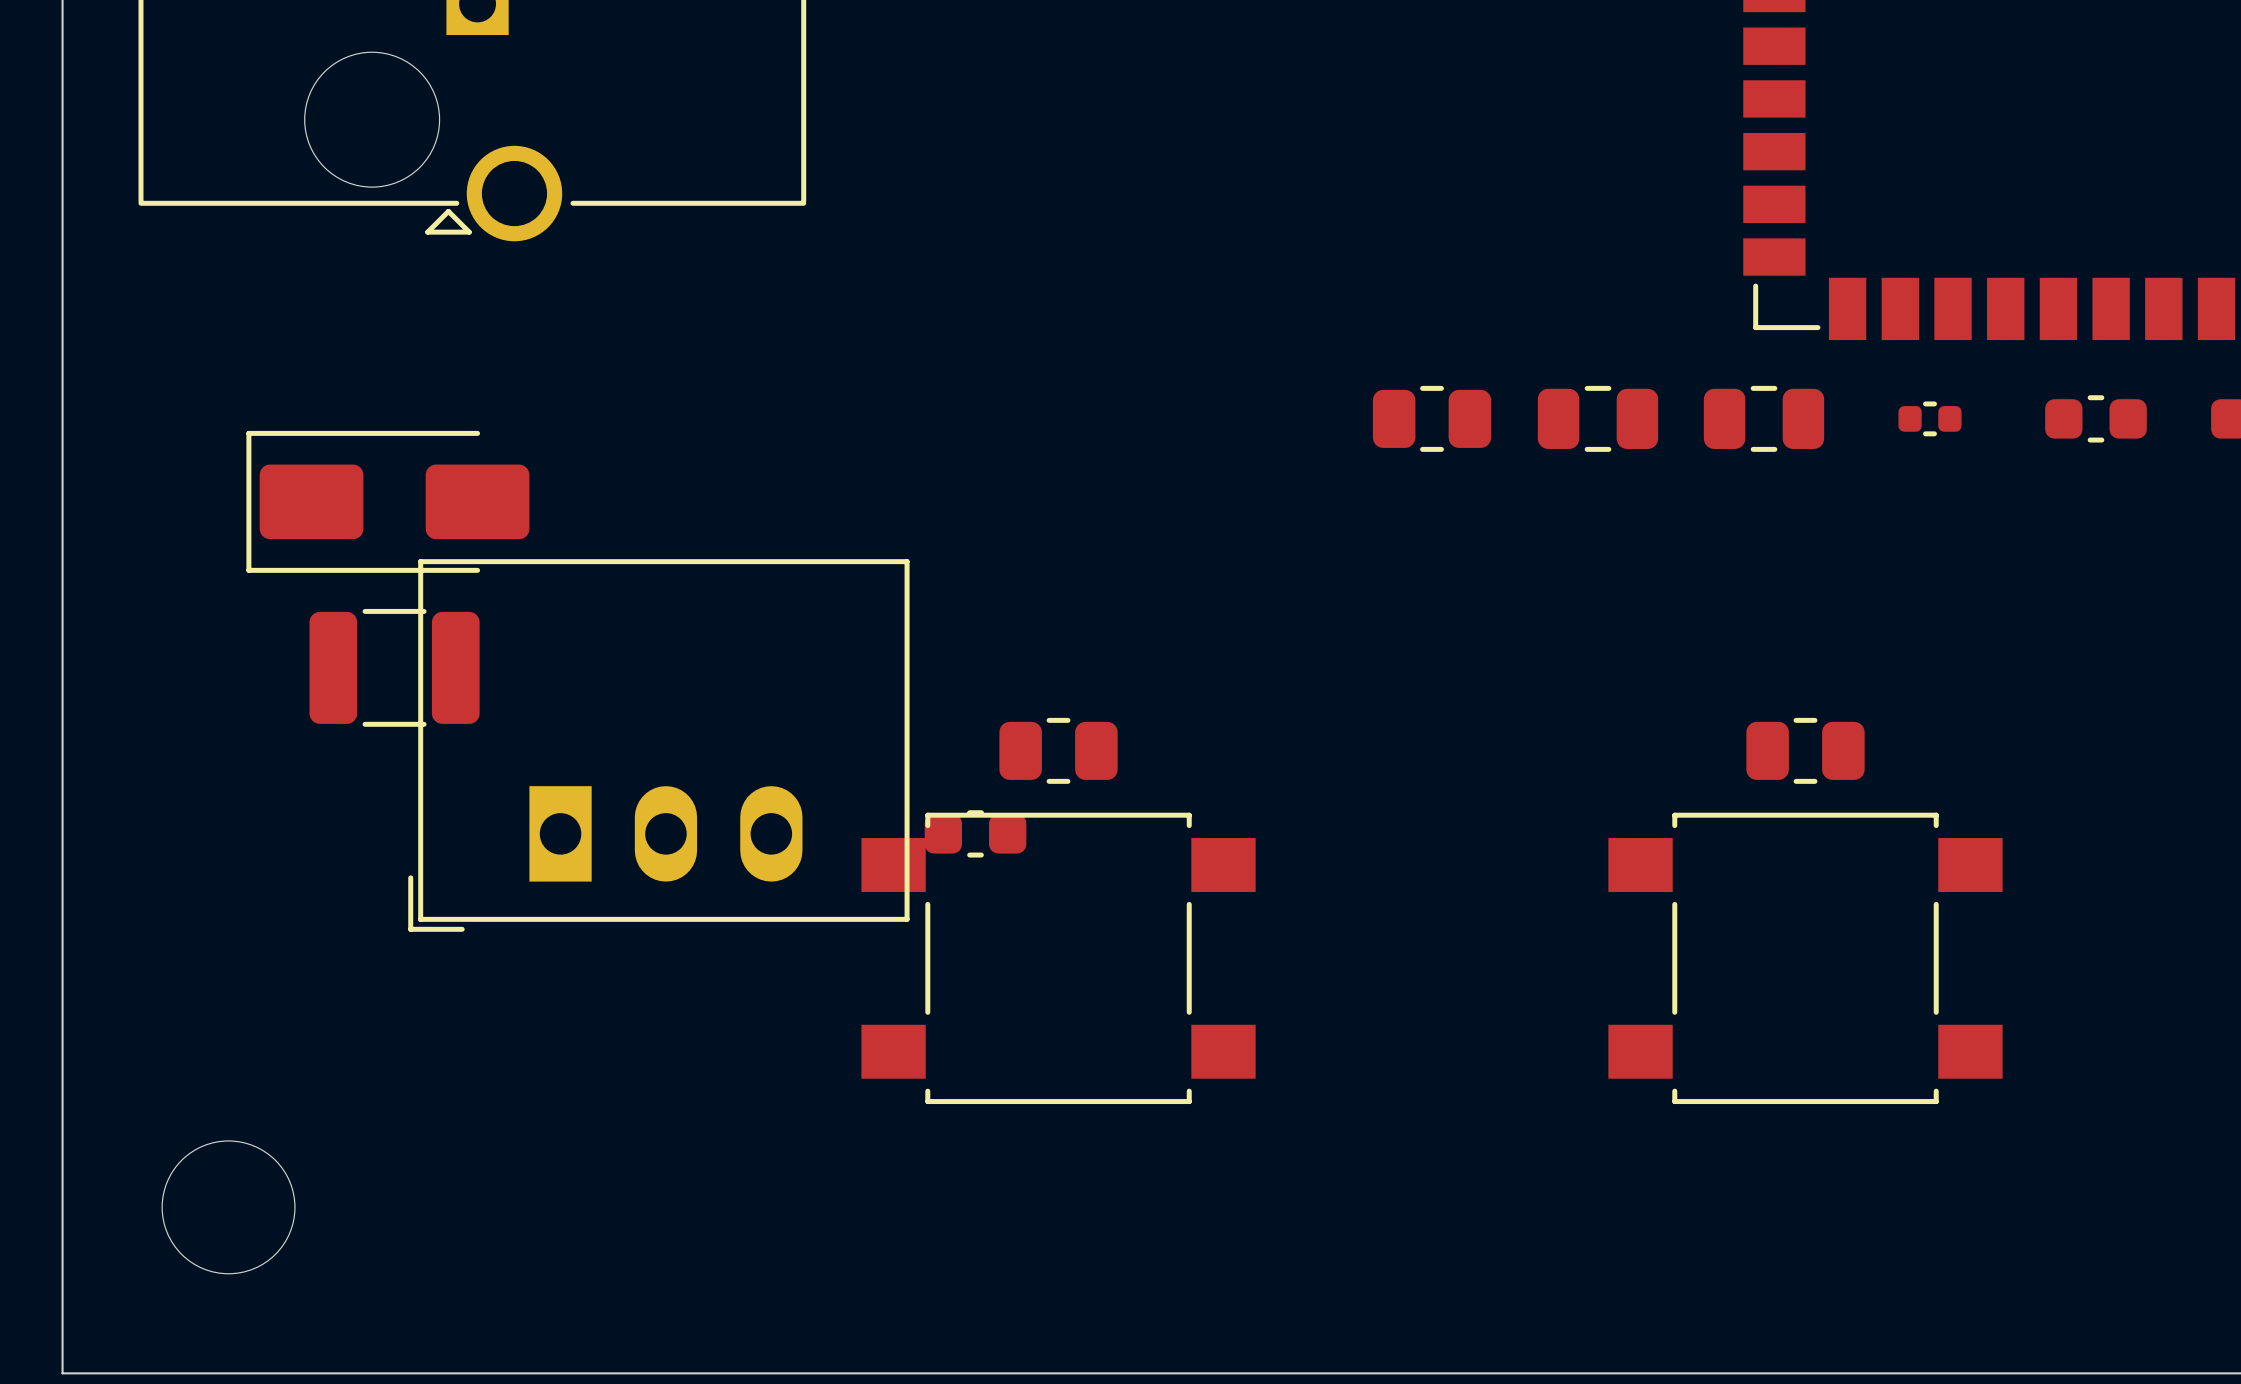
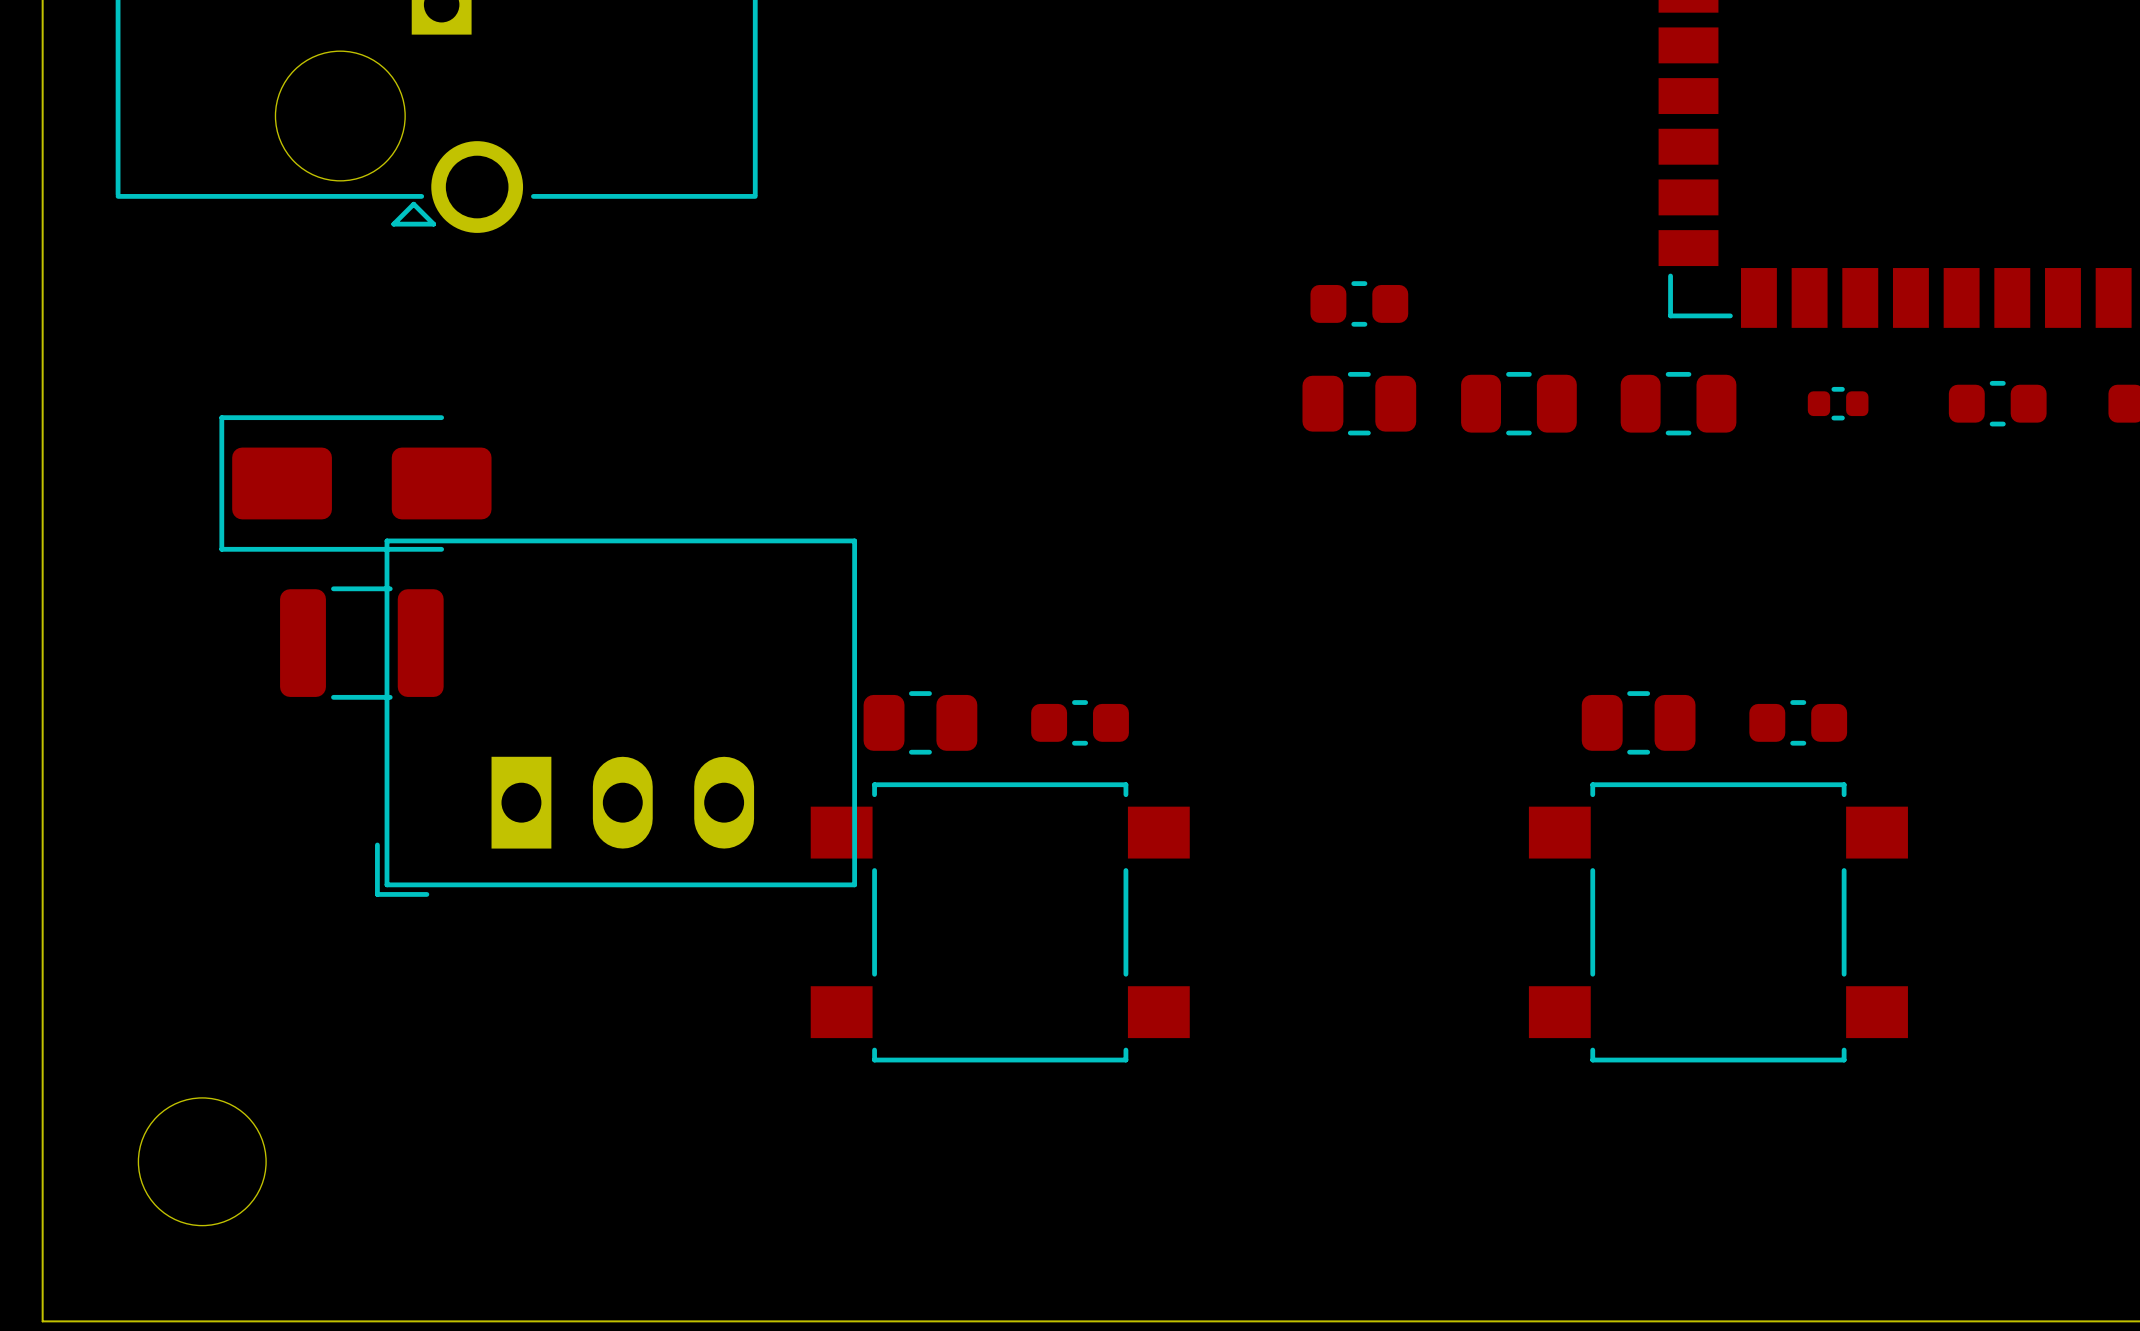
part: none -> (1359, 303)
part position: (1058, 750) -> (920, 722)
part position: (1805, 750) -> (1638, 722)
part: none -> (1798, 722)
part position: (975, 833) -> (1080, 722)

